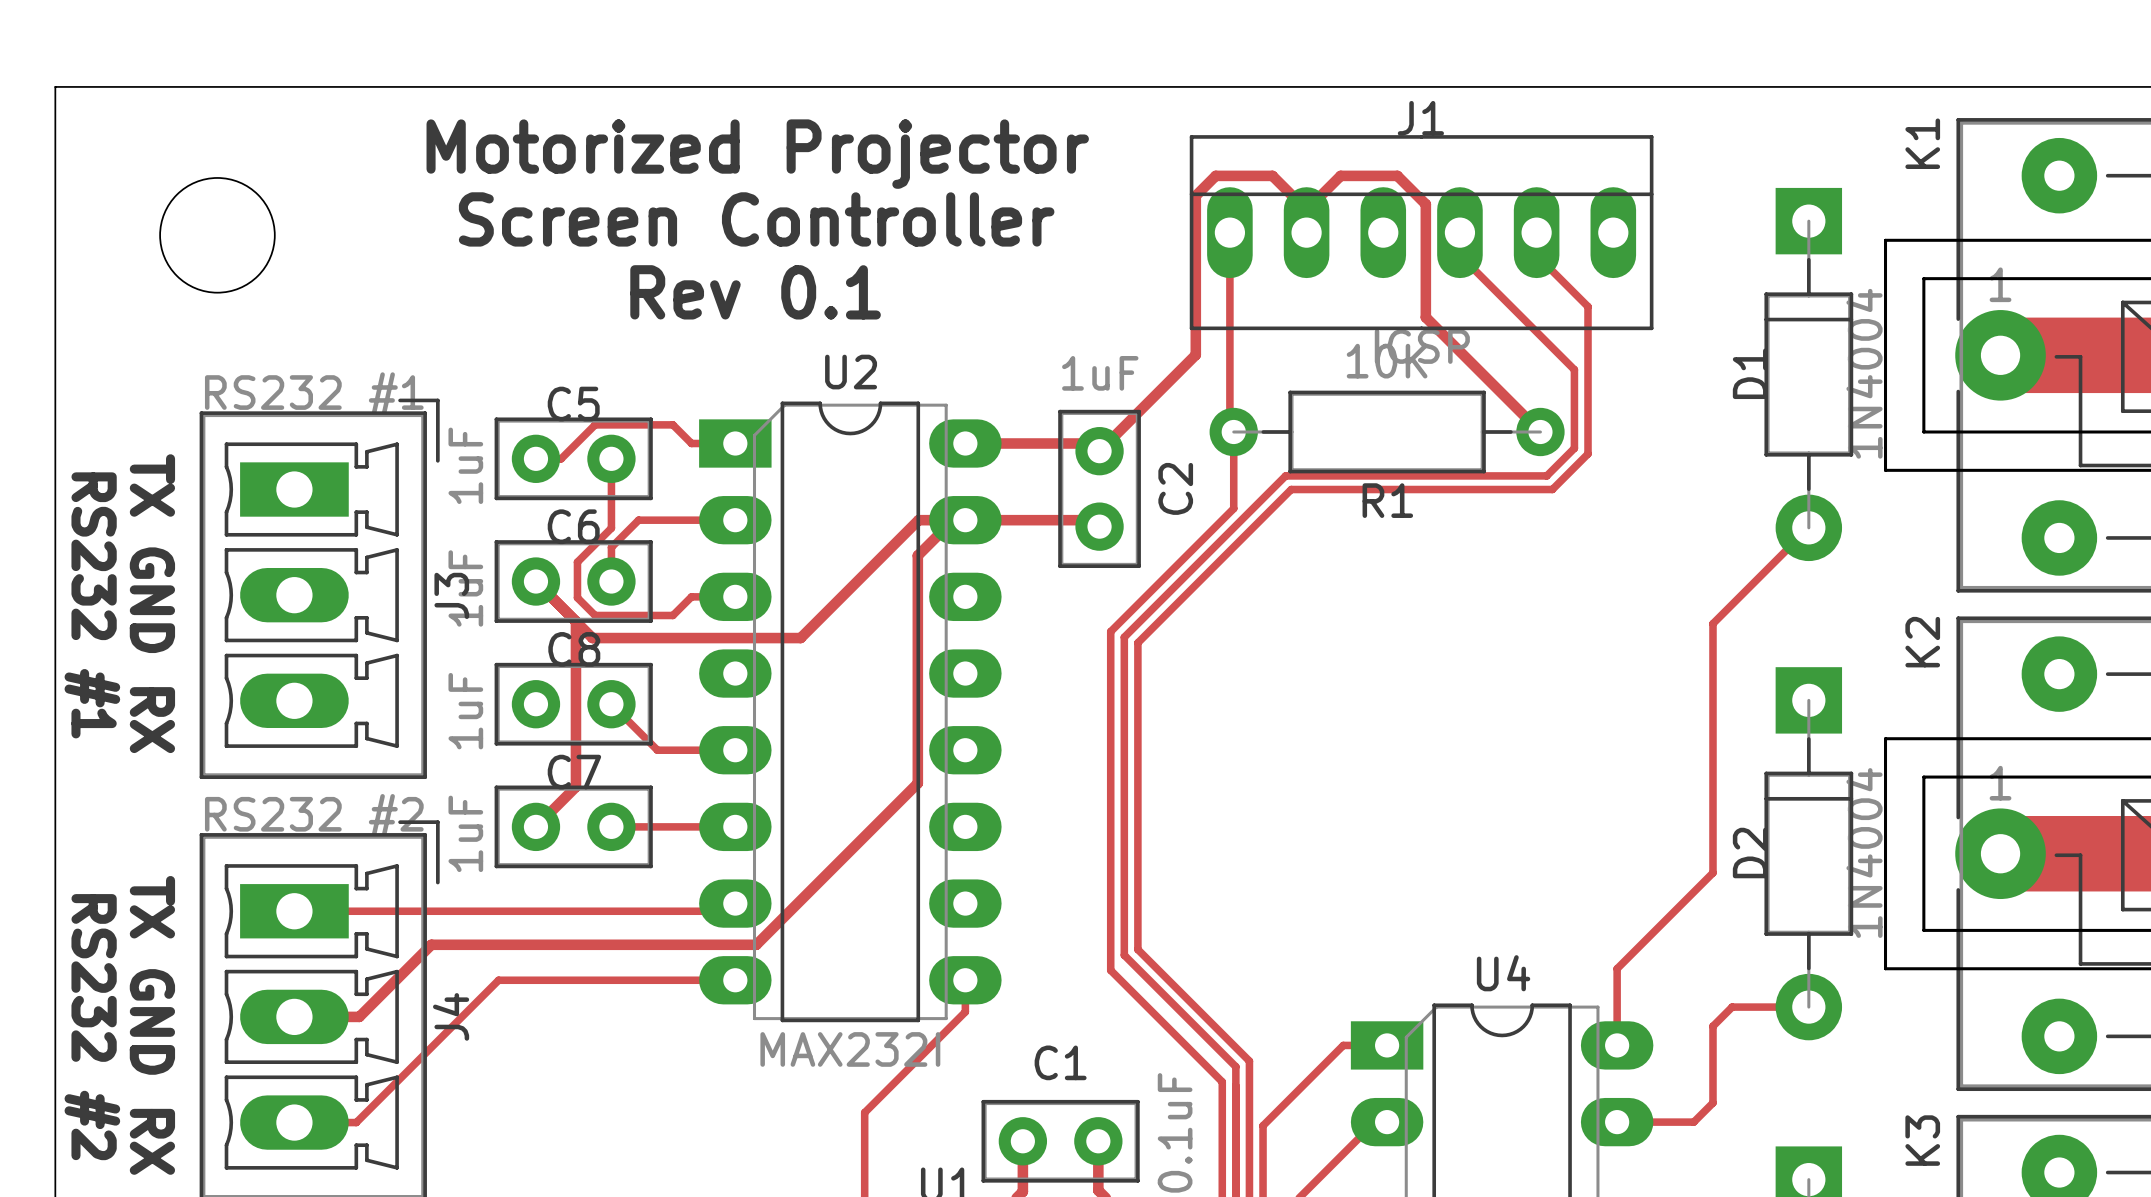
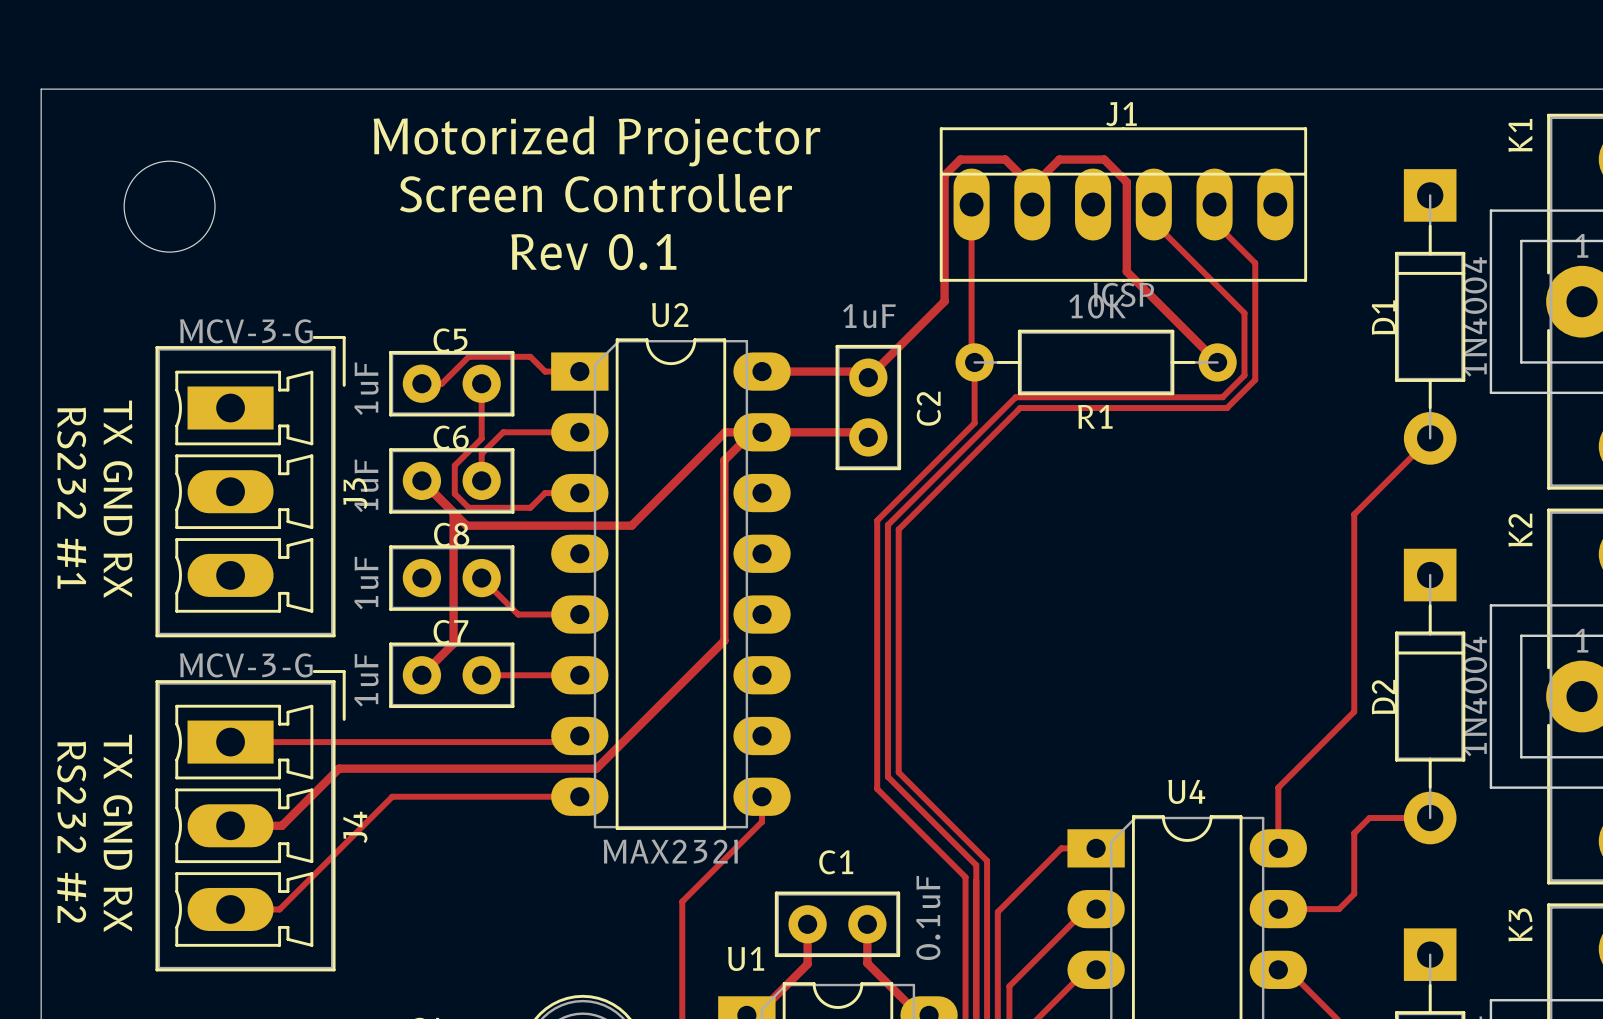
J3 value: RS232 #1 (314, 393) -> MCV-3-G (246, 331)
J4 value: RS232 #2 (314, 815) -> MCV-3-G (246, 665)

